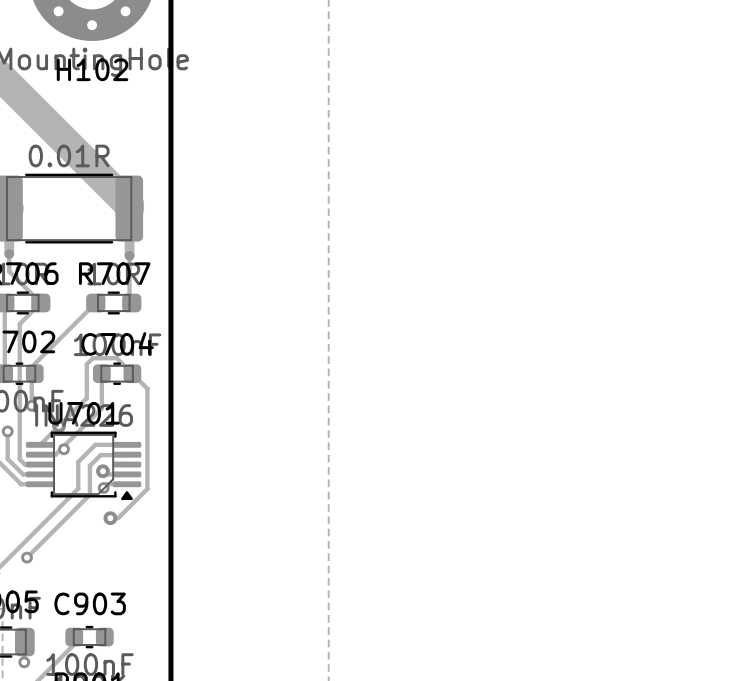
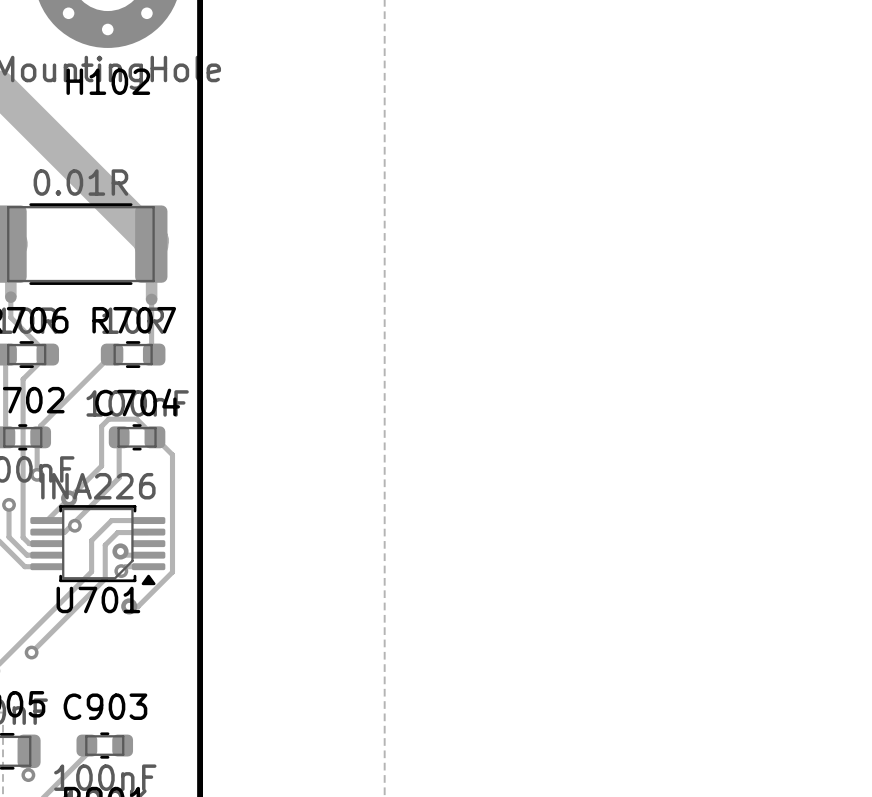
U701 name position: U701 (84, 413) -> U701 (98, 599)

